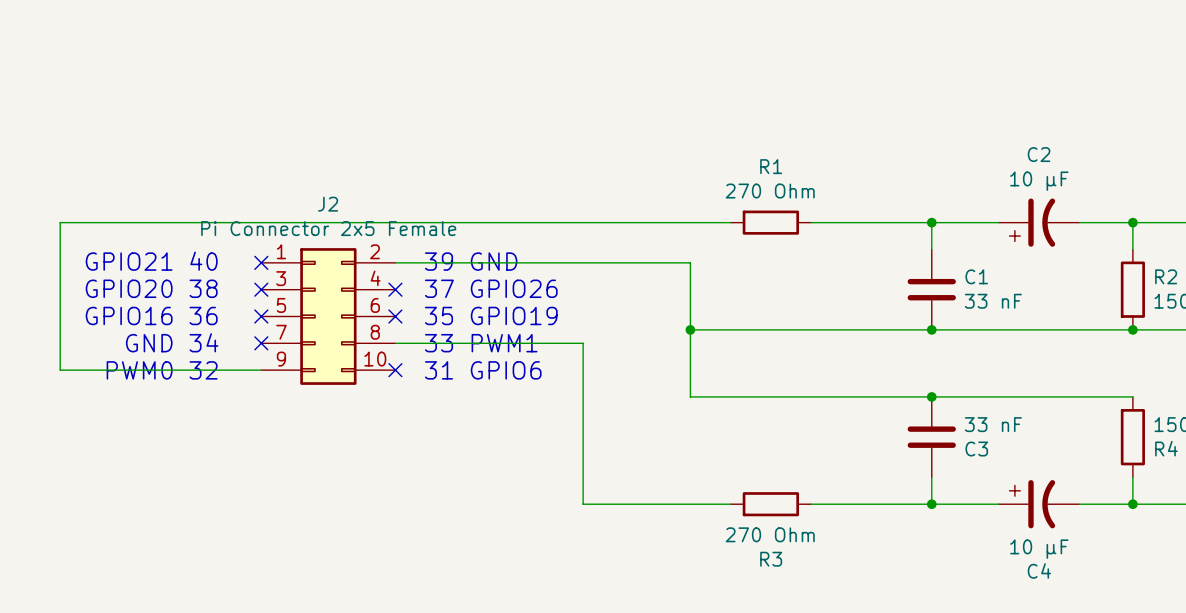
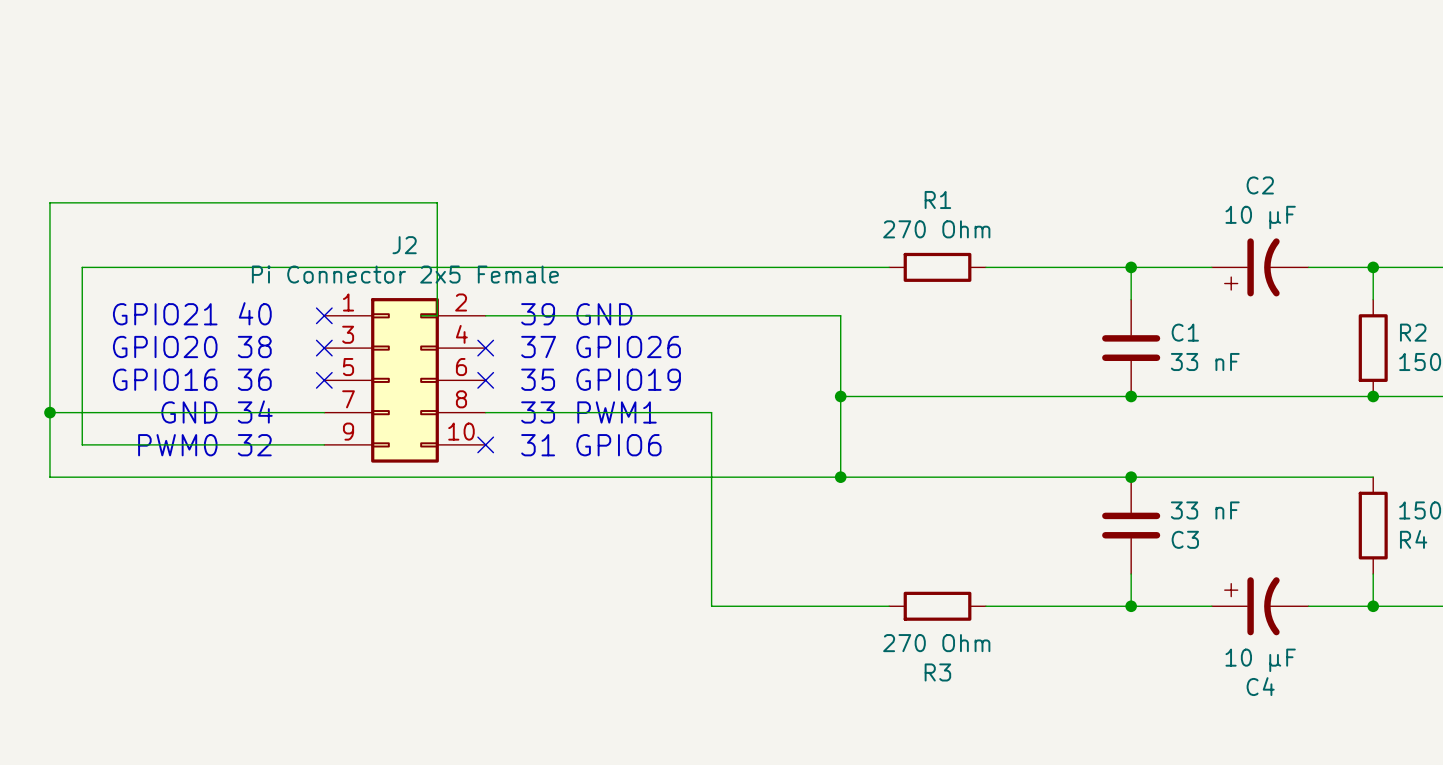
wire: none -> (421, 315) (437, 315) (437, 202) (49, 202) (49, 477) (840, 477)
wire: none -> (49, 412) (324, 412)
junction: none -> (49, 412)
no-connect mark: (261, 343) -> none
junction: none -> (840, 477)

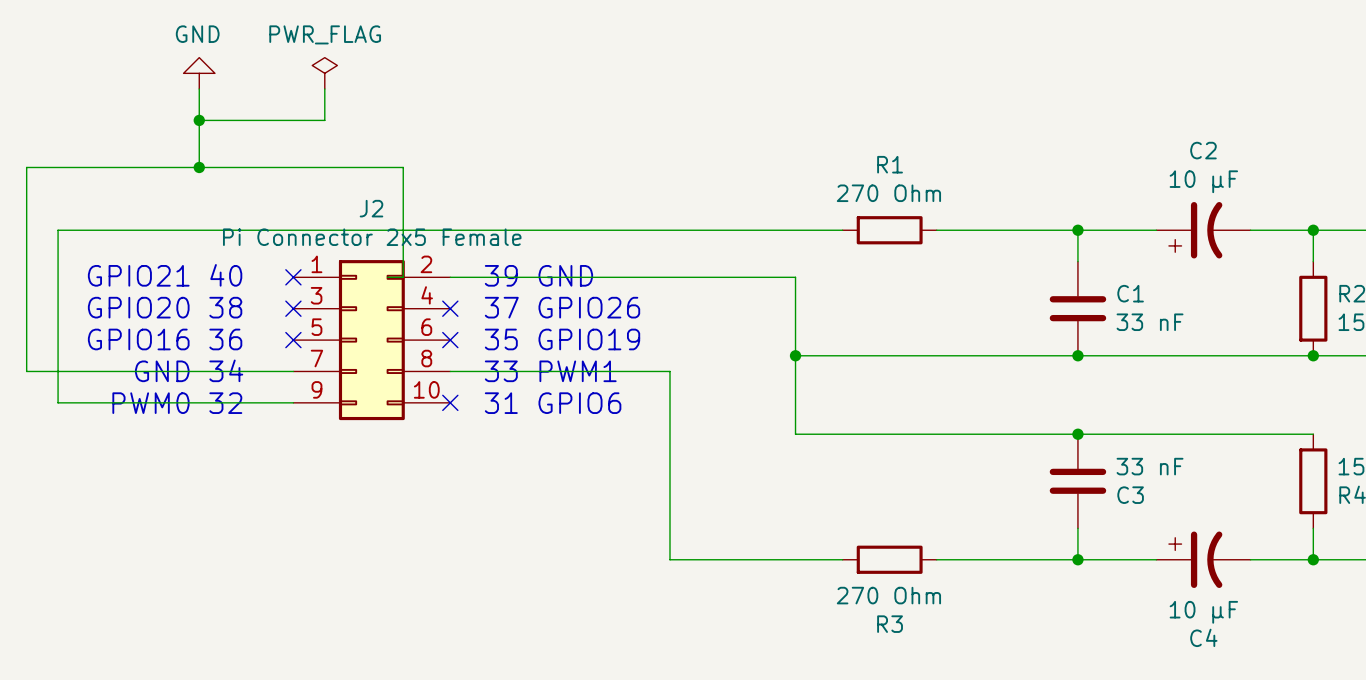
power symbol: none -> GND (199, 73)
power symbol: none -> PWR_FLAG (324, 73)
wire: none -> (199, 89) (199, 167)
wire: none -> (324, 89) (324, 120) (199, 120)
junction: none -> (199, 120)
junction: none -> (199, 167)
wire: (49, 412) (49, 477) (840, 477) -> none
junction: (49, 412) -> none
junction: (840, 477) -> none

